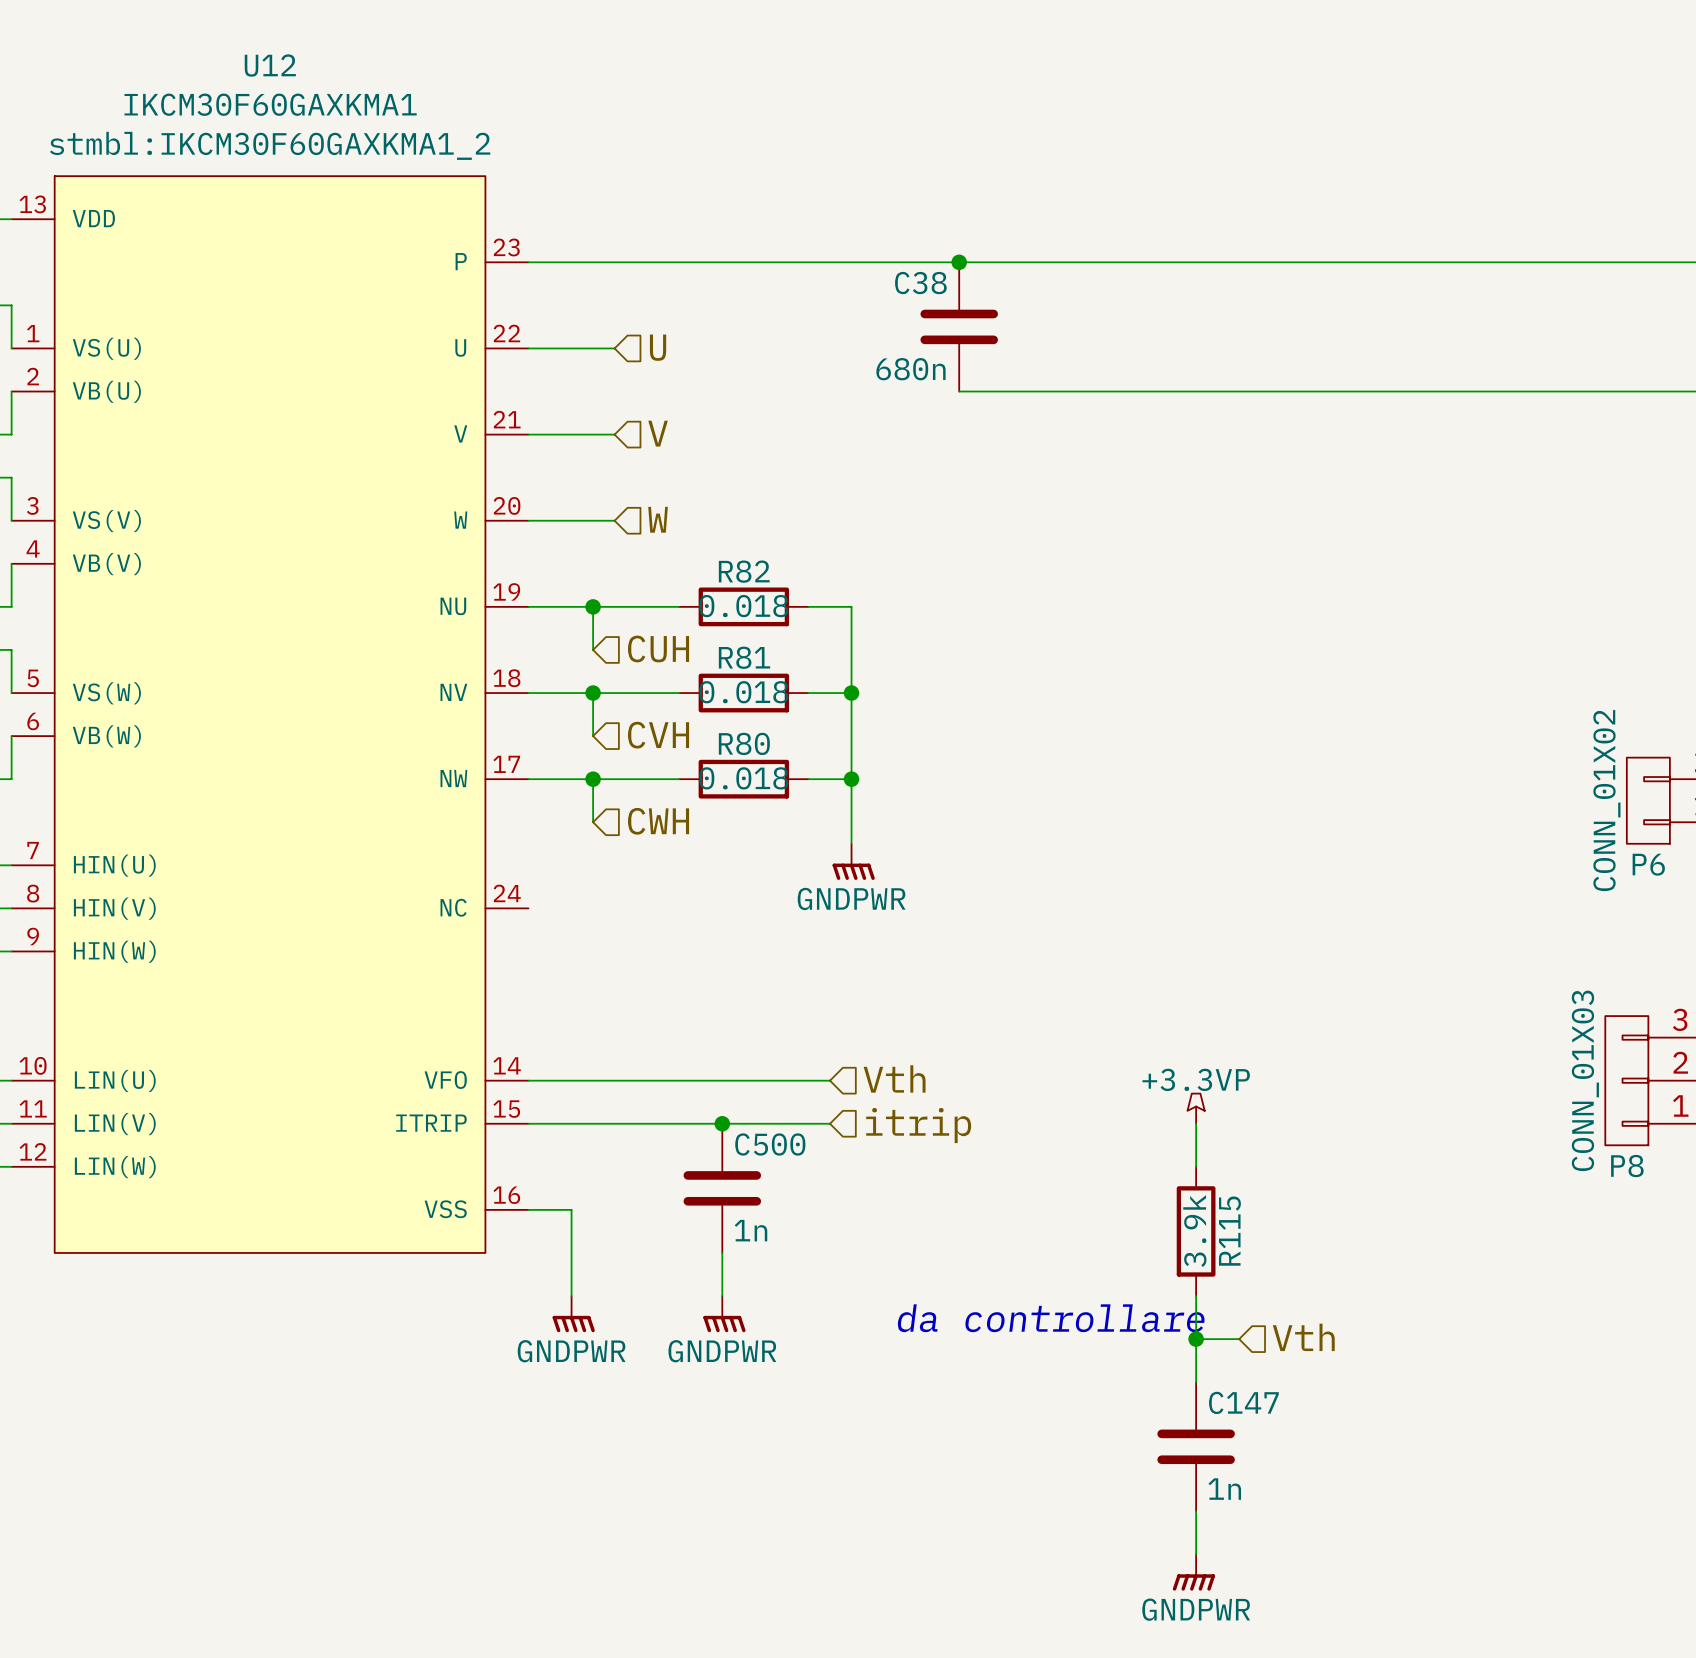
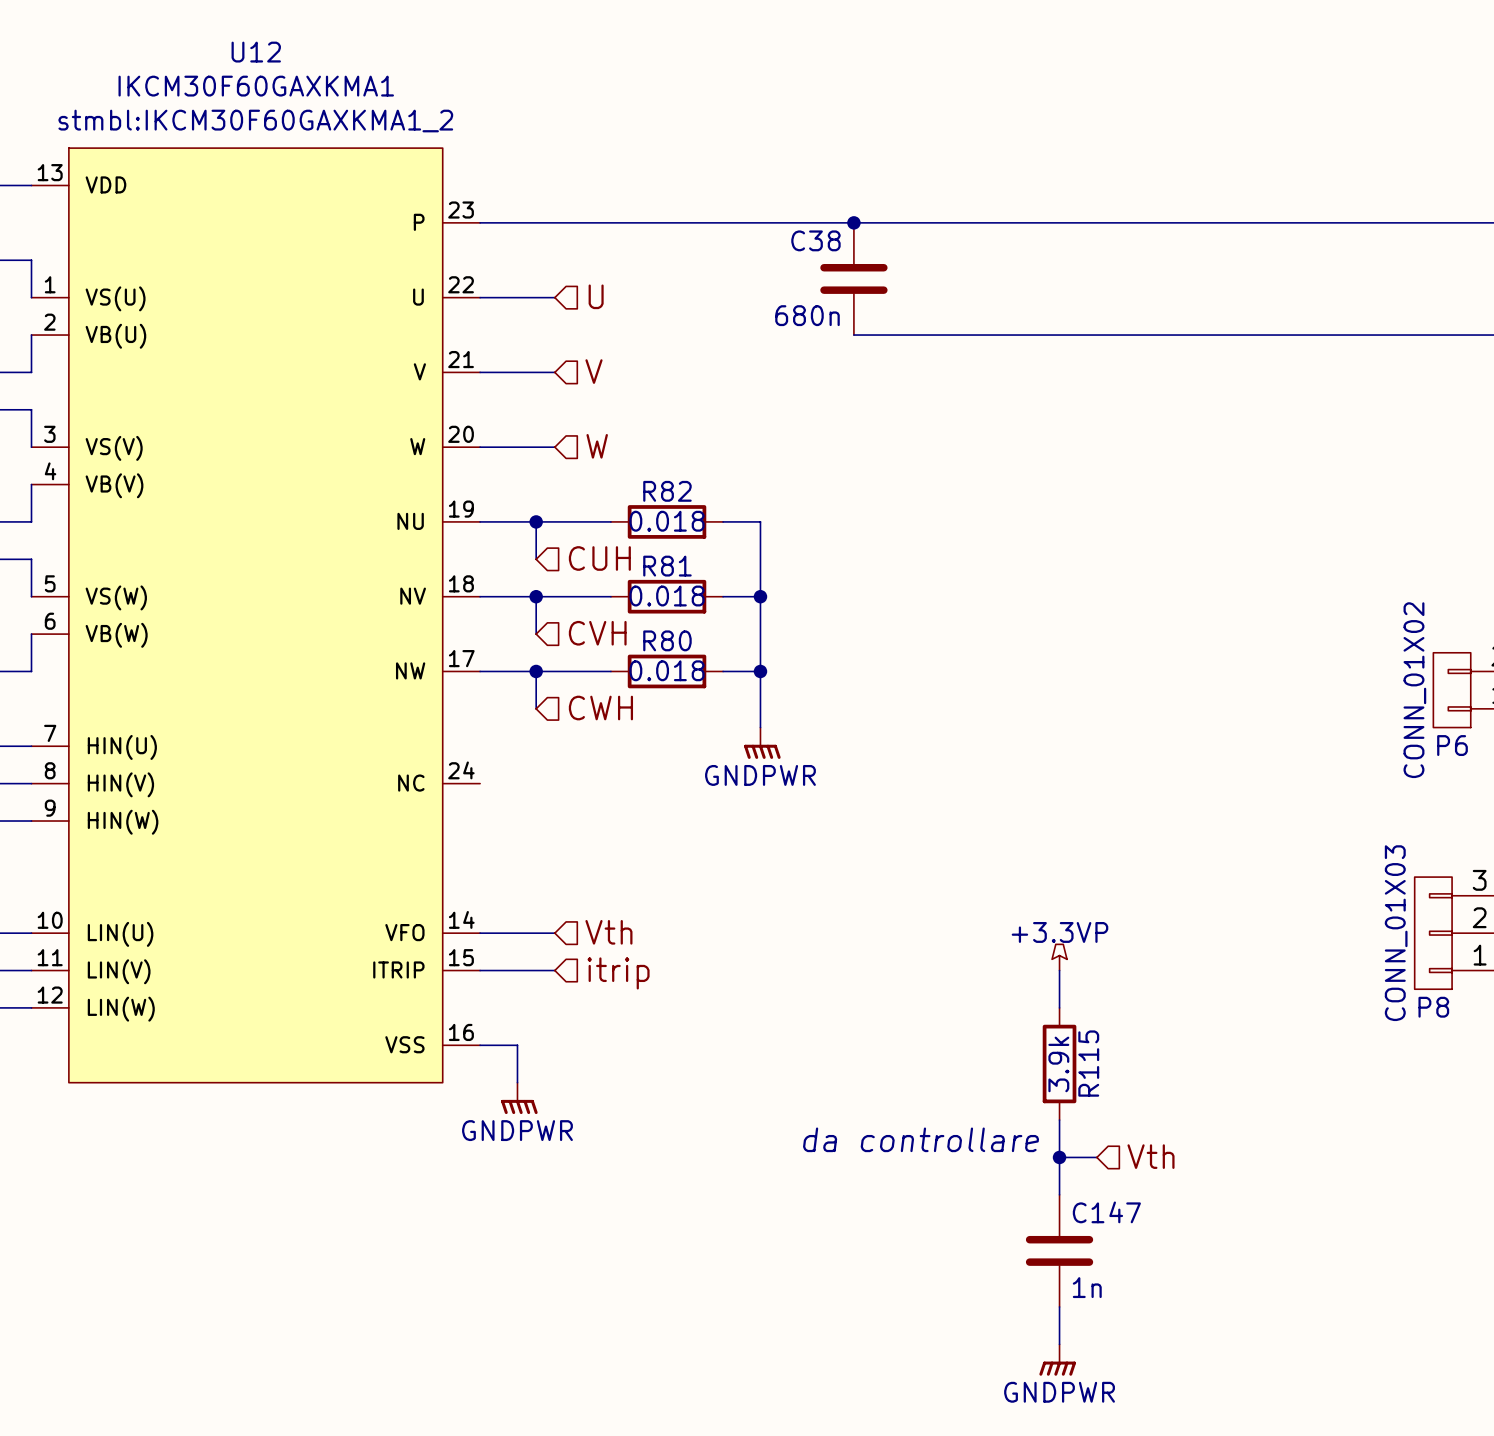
hierarchical label position: Vth (894, 1078) -> Vth (608, 932)
wire: (614, 1080) (829, 1080) -> none
wire: (614, 1123) (829, 1123) -> none
junction: (722, 1123) -> none
hierarchical label position: itrip (918, 1125) -> itrip (618, 973)
C500: 1n (722, 1188) -> none
wire: (722, 1252) (722, 1296) -> none
power symbol position: GNDPWR (573, 1314) -> GNDPWR (519, 1098)
power symbol: GNDPWR (724, 1314) -> none

